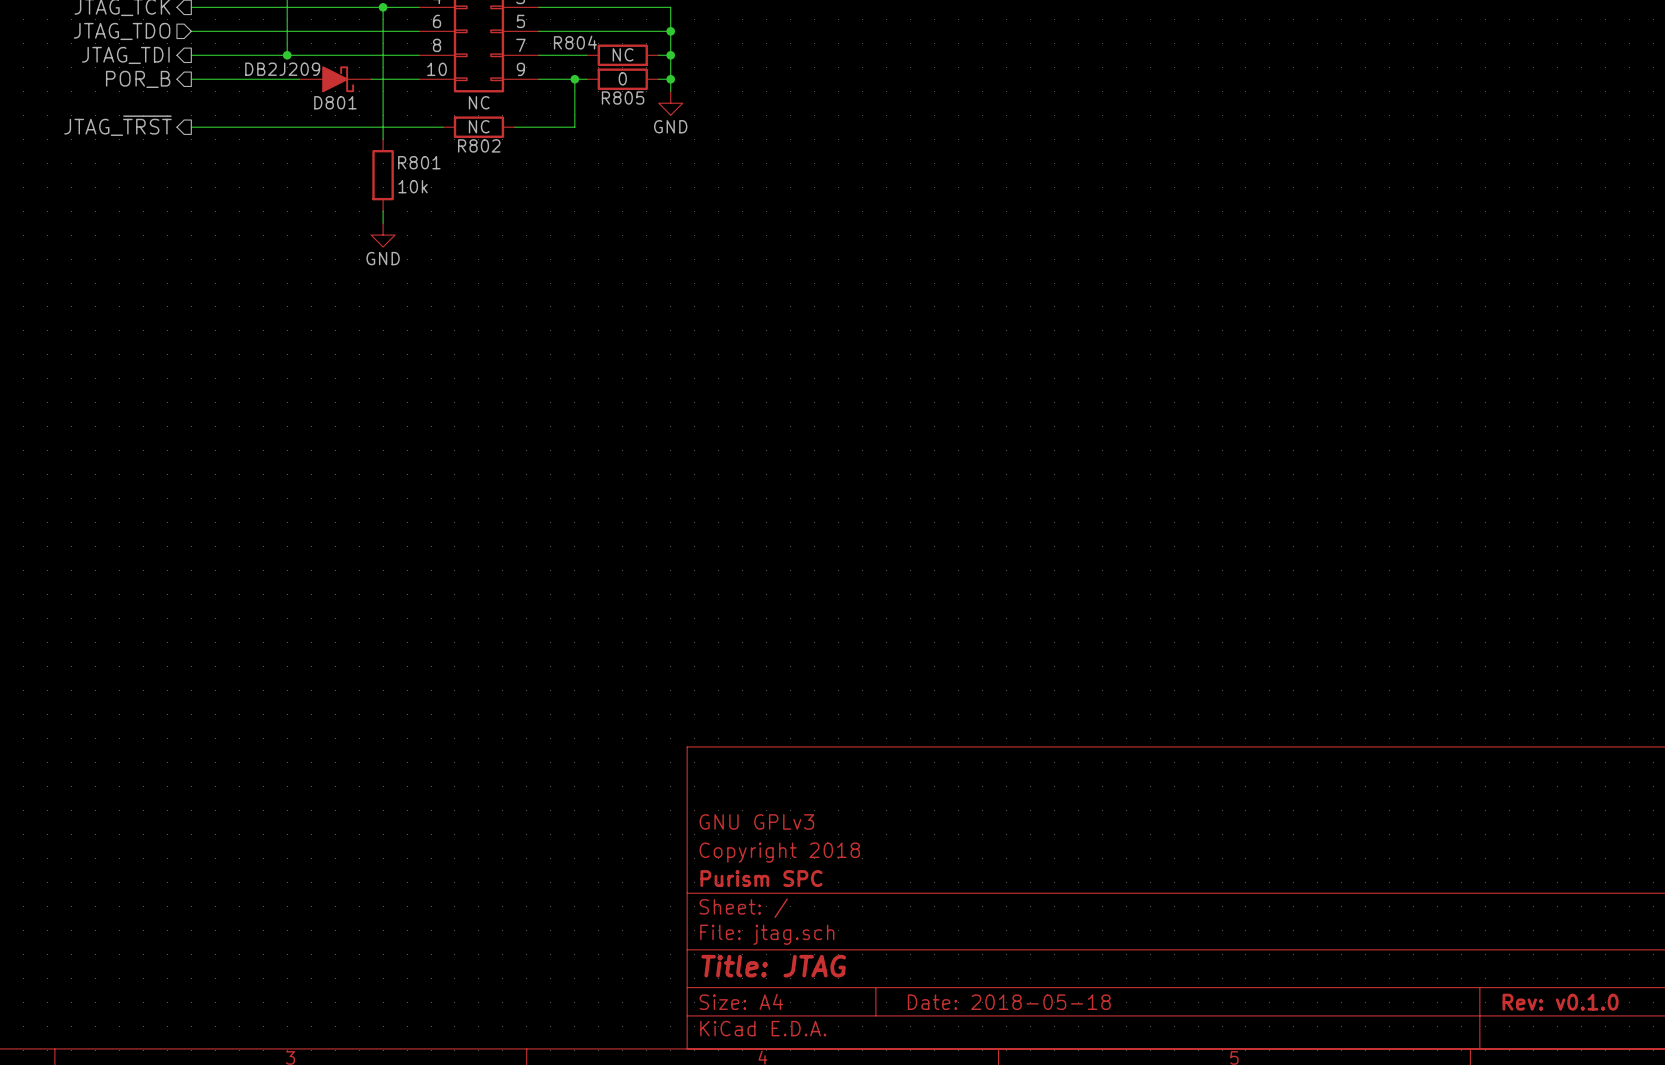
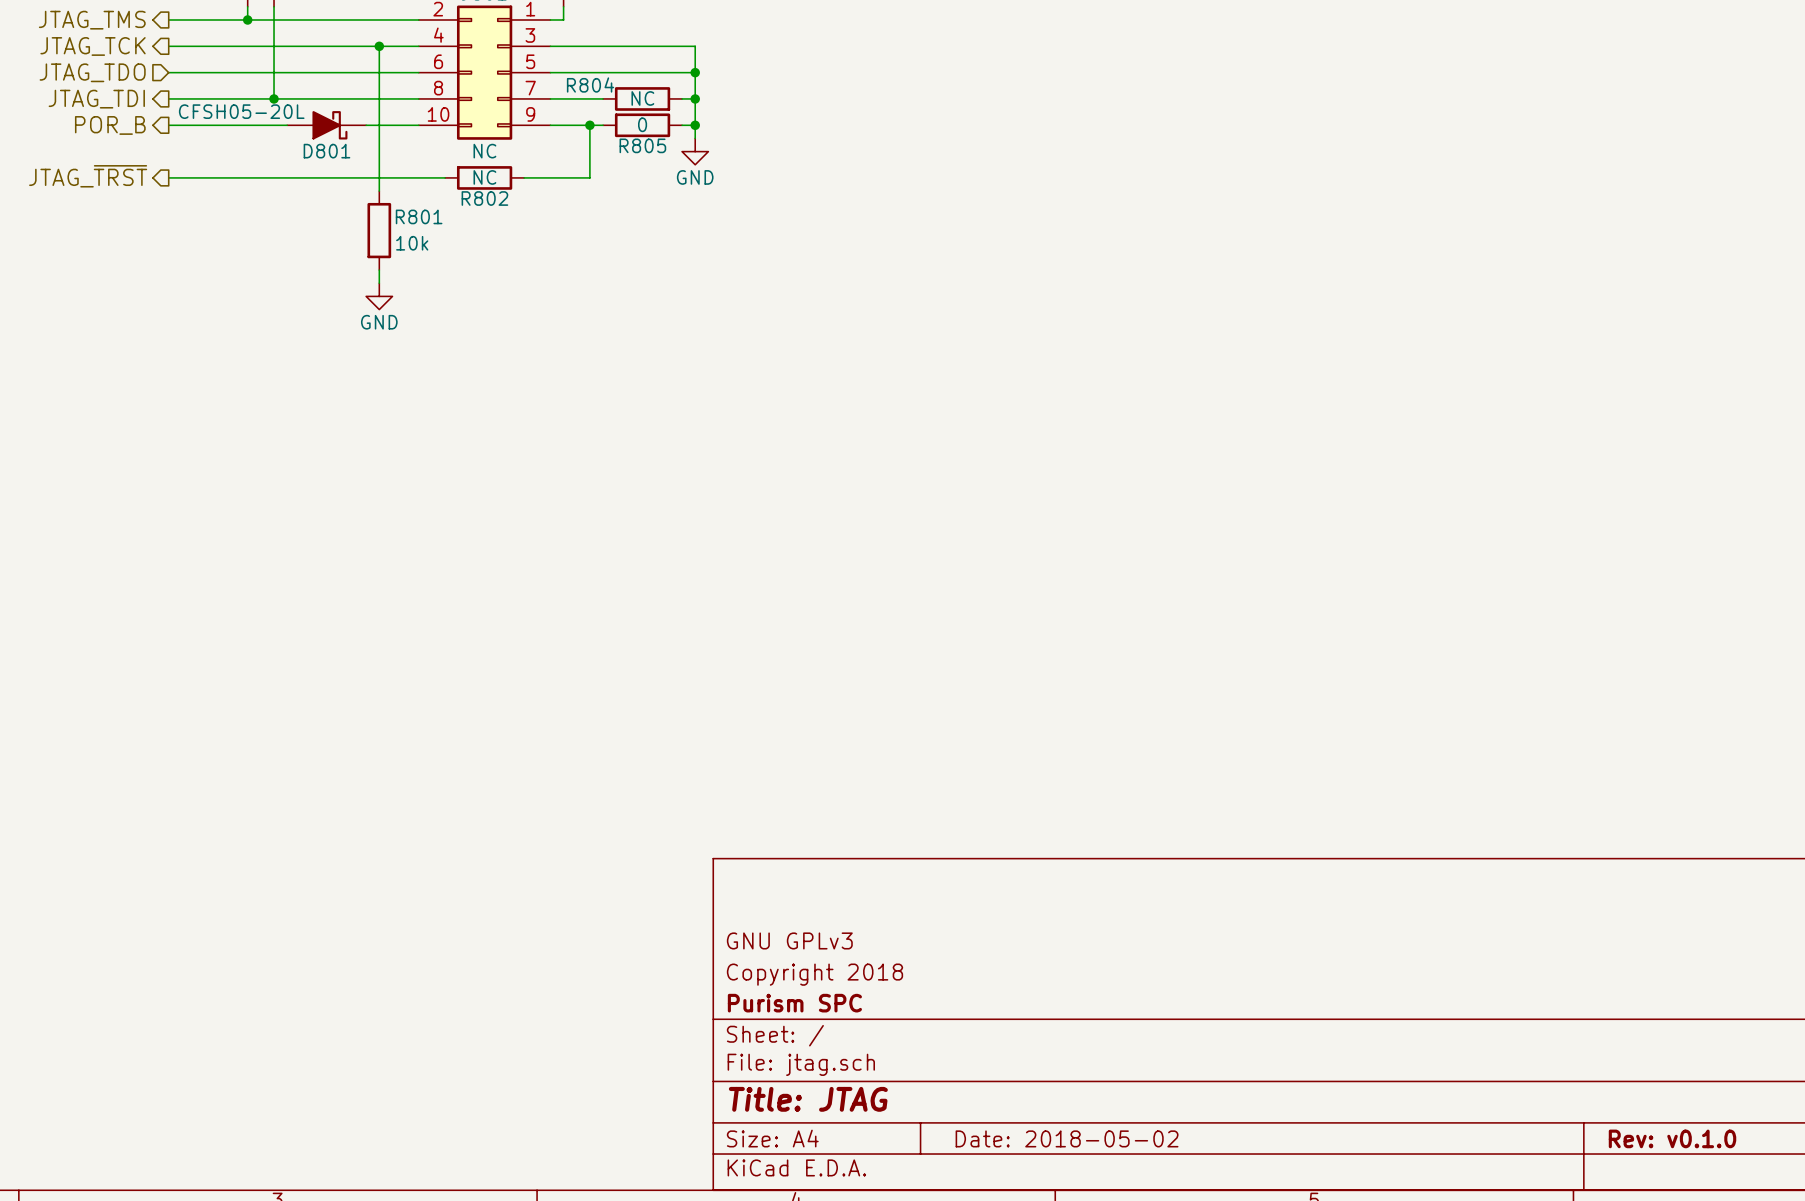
D801 value: DB2J209 (282, 69) -> CFSH05-20L (241, 111)
title block: Date: 2018-05-18 (1009, 1002) -> Date: 2018-05-02 (1067, 1138)

